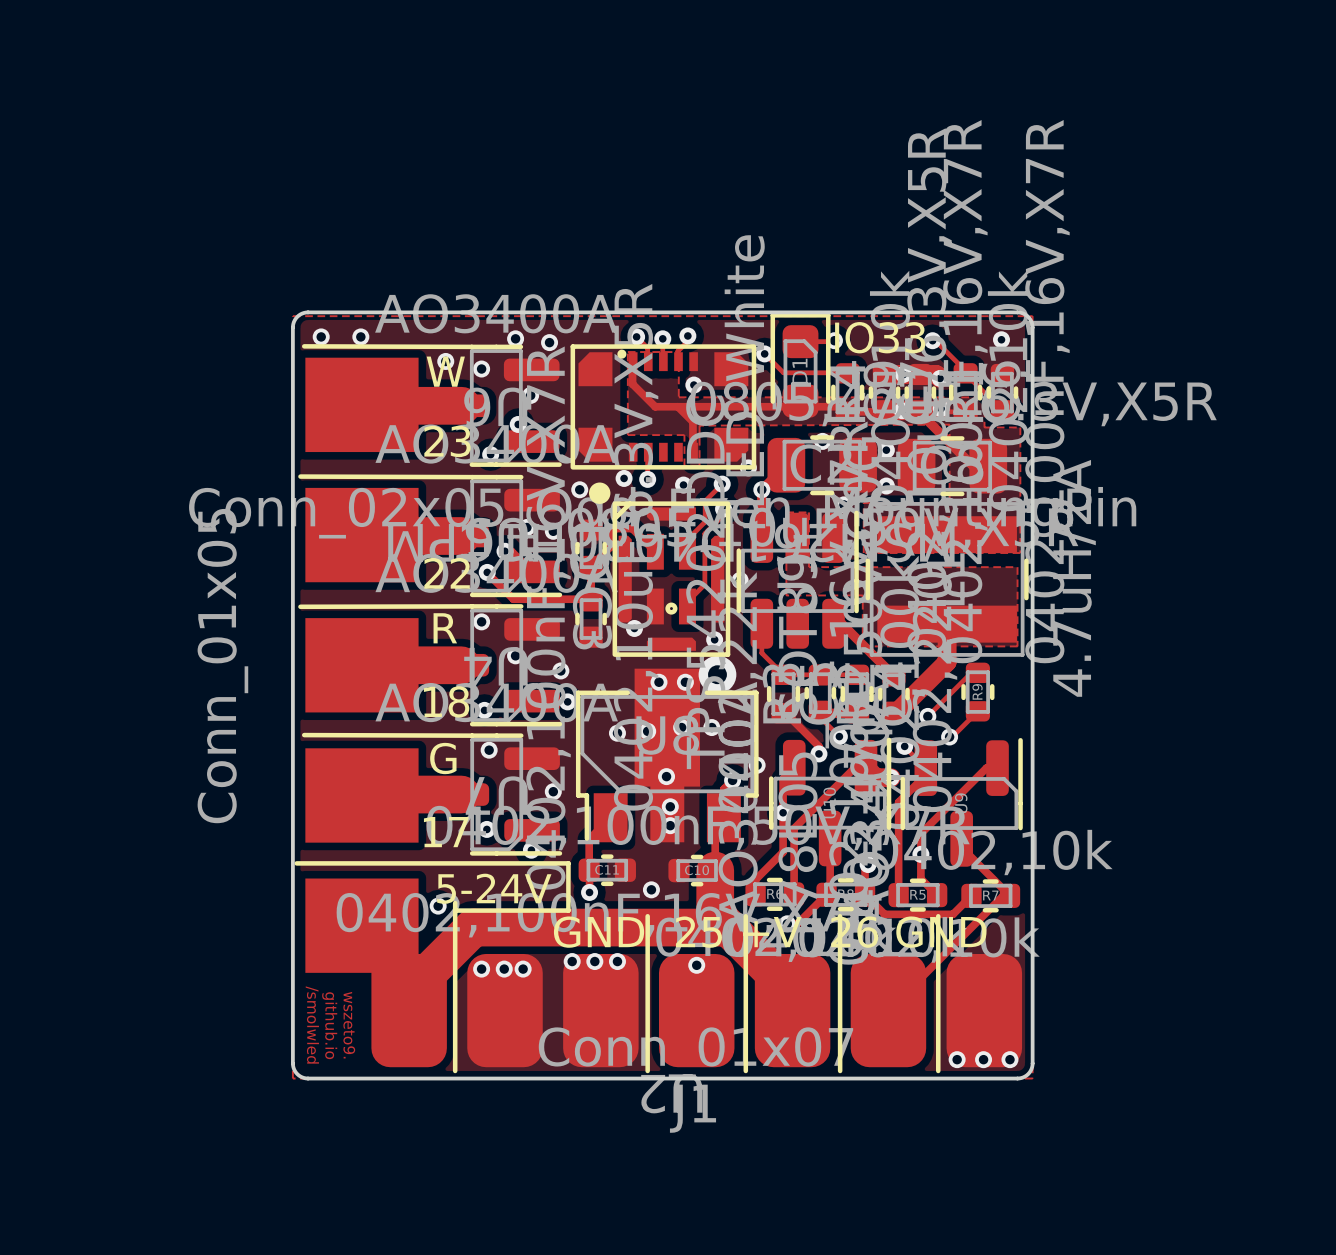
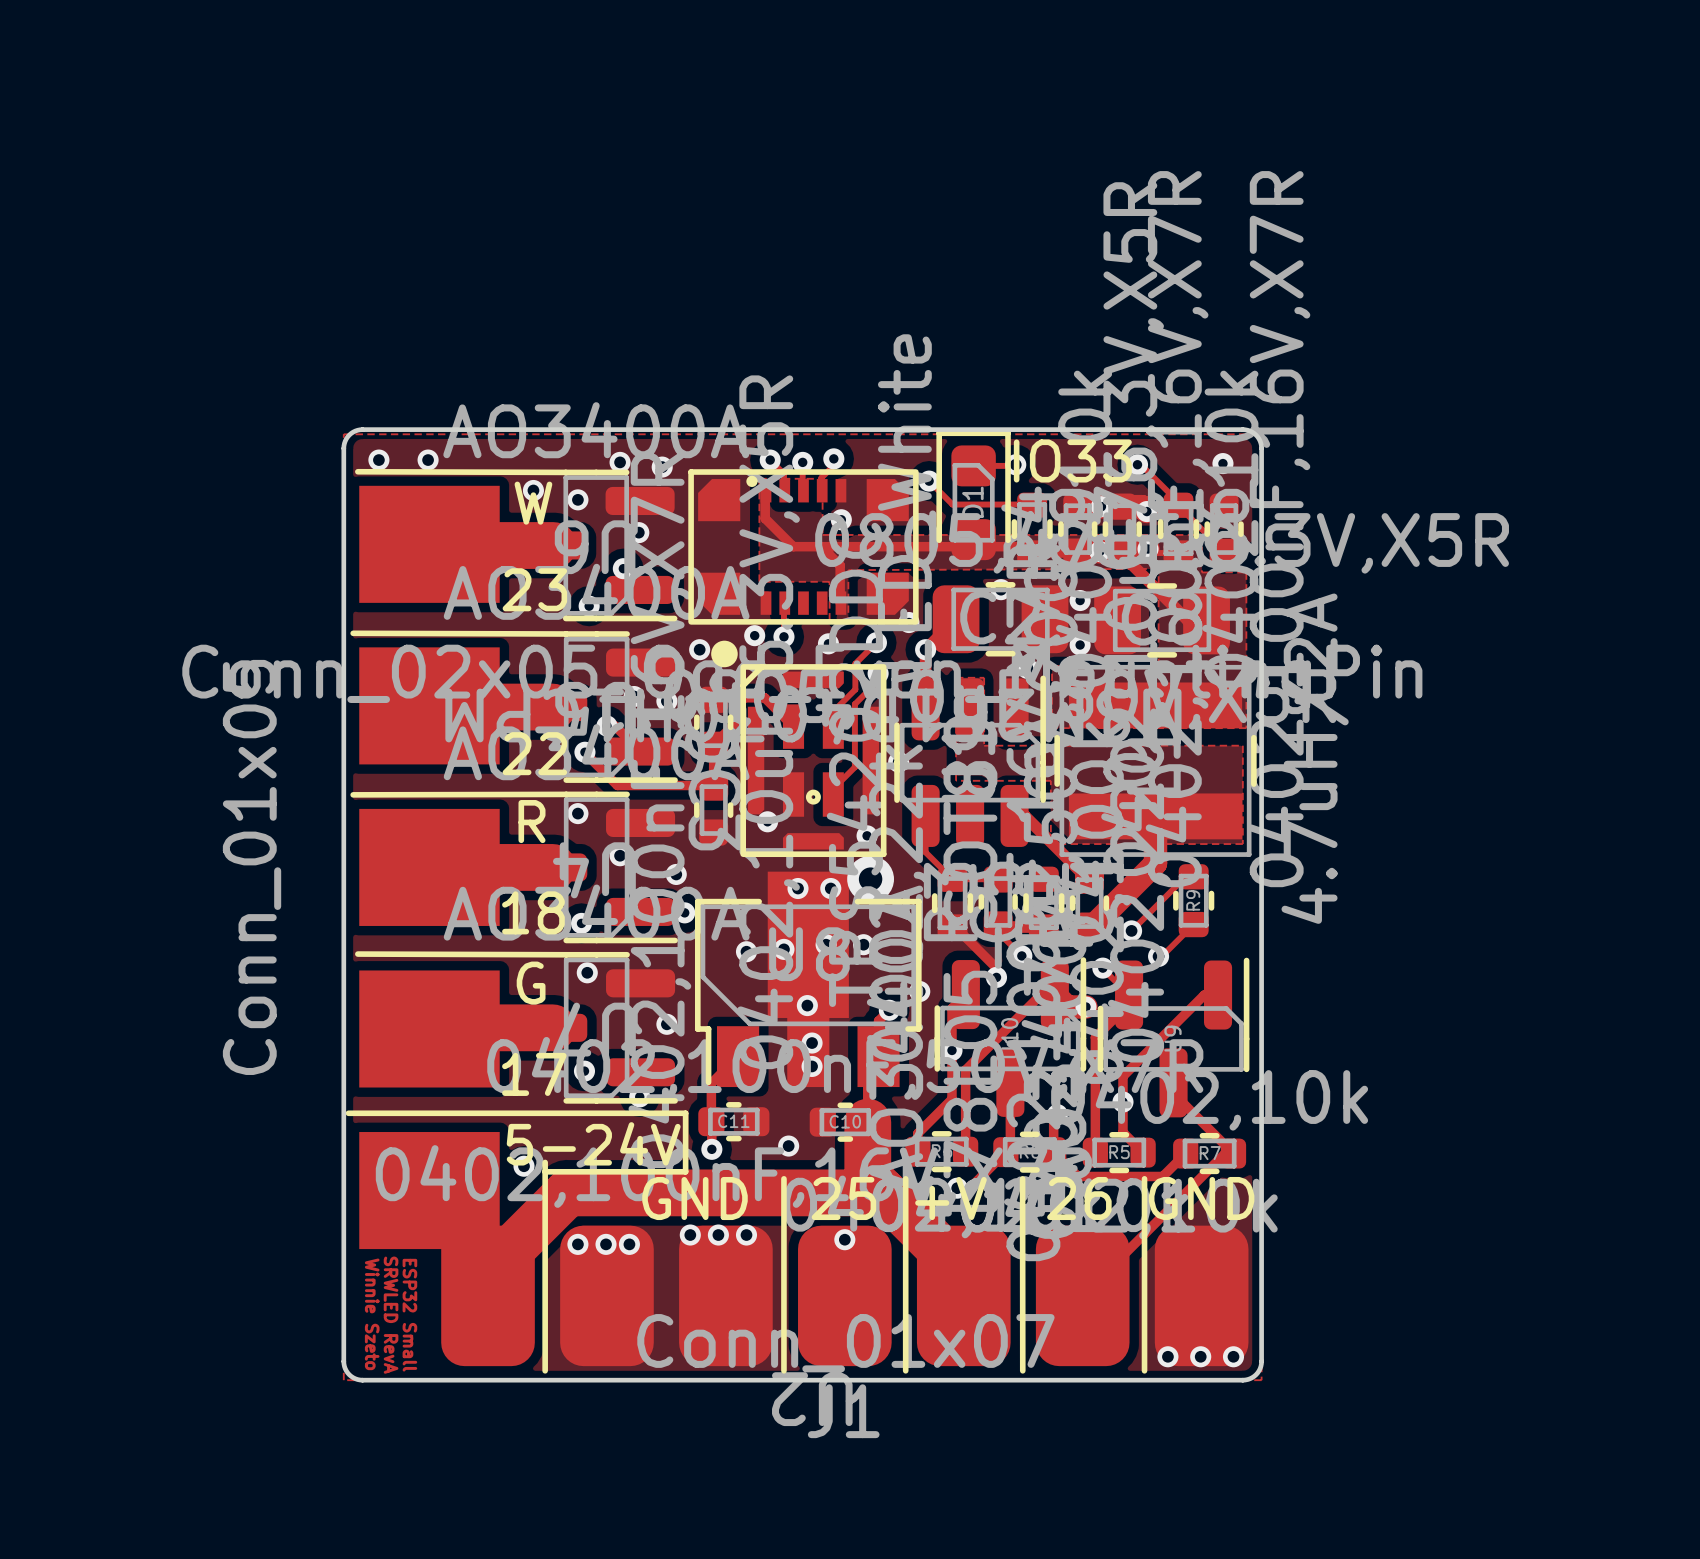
text: /smolwled (312, 1024) -> Winnie Szeto (372, 1314)
text: github.io (329, 1025) -> SRWLED RevA (391, 1315)
text: wszeto9. (349, 1025) -> ESP32 Small (409, 1315)

